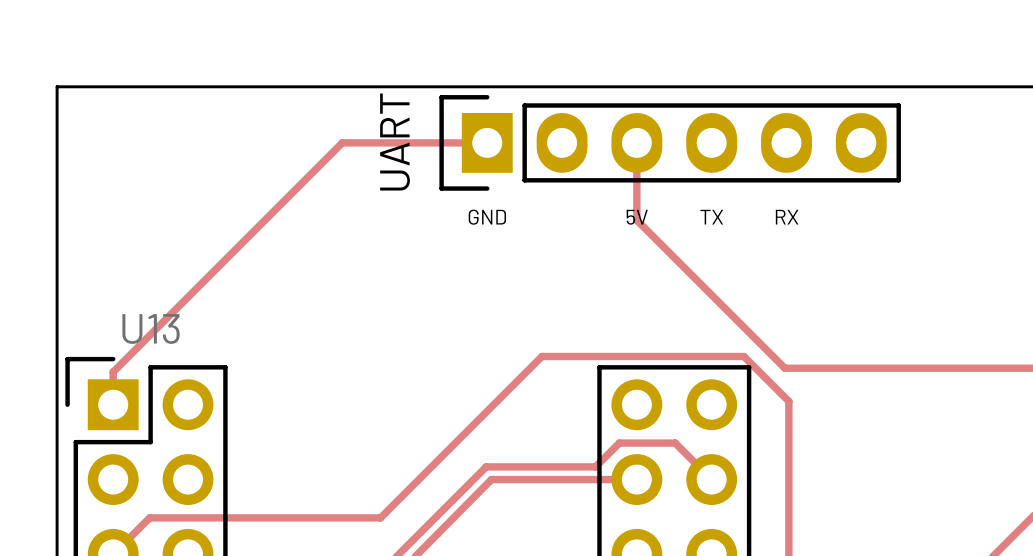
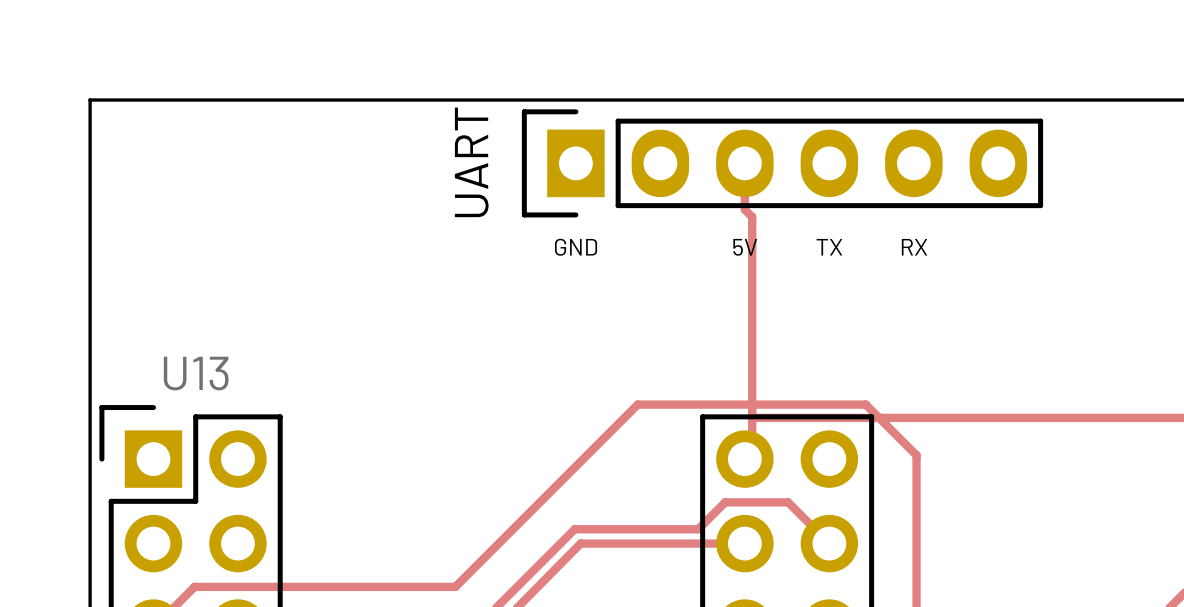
track: (487, 142) (342, 142) (113, 371) (113, 404) -> none
track: (636, 183) (636, 220) (784, 368) -> (744, 209) (752, 216) (752, 438)
track: none -> (752, 417) (912, 417)

